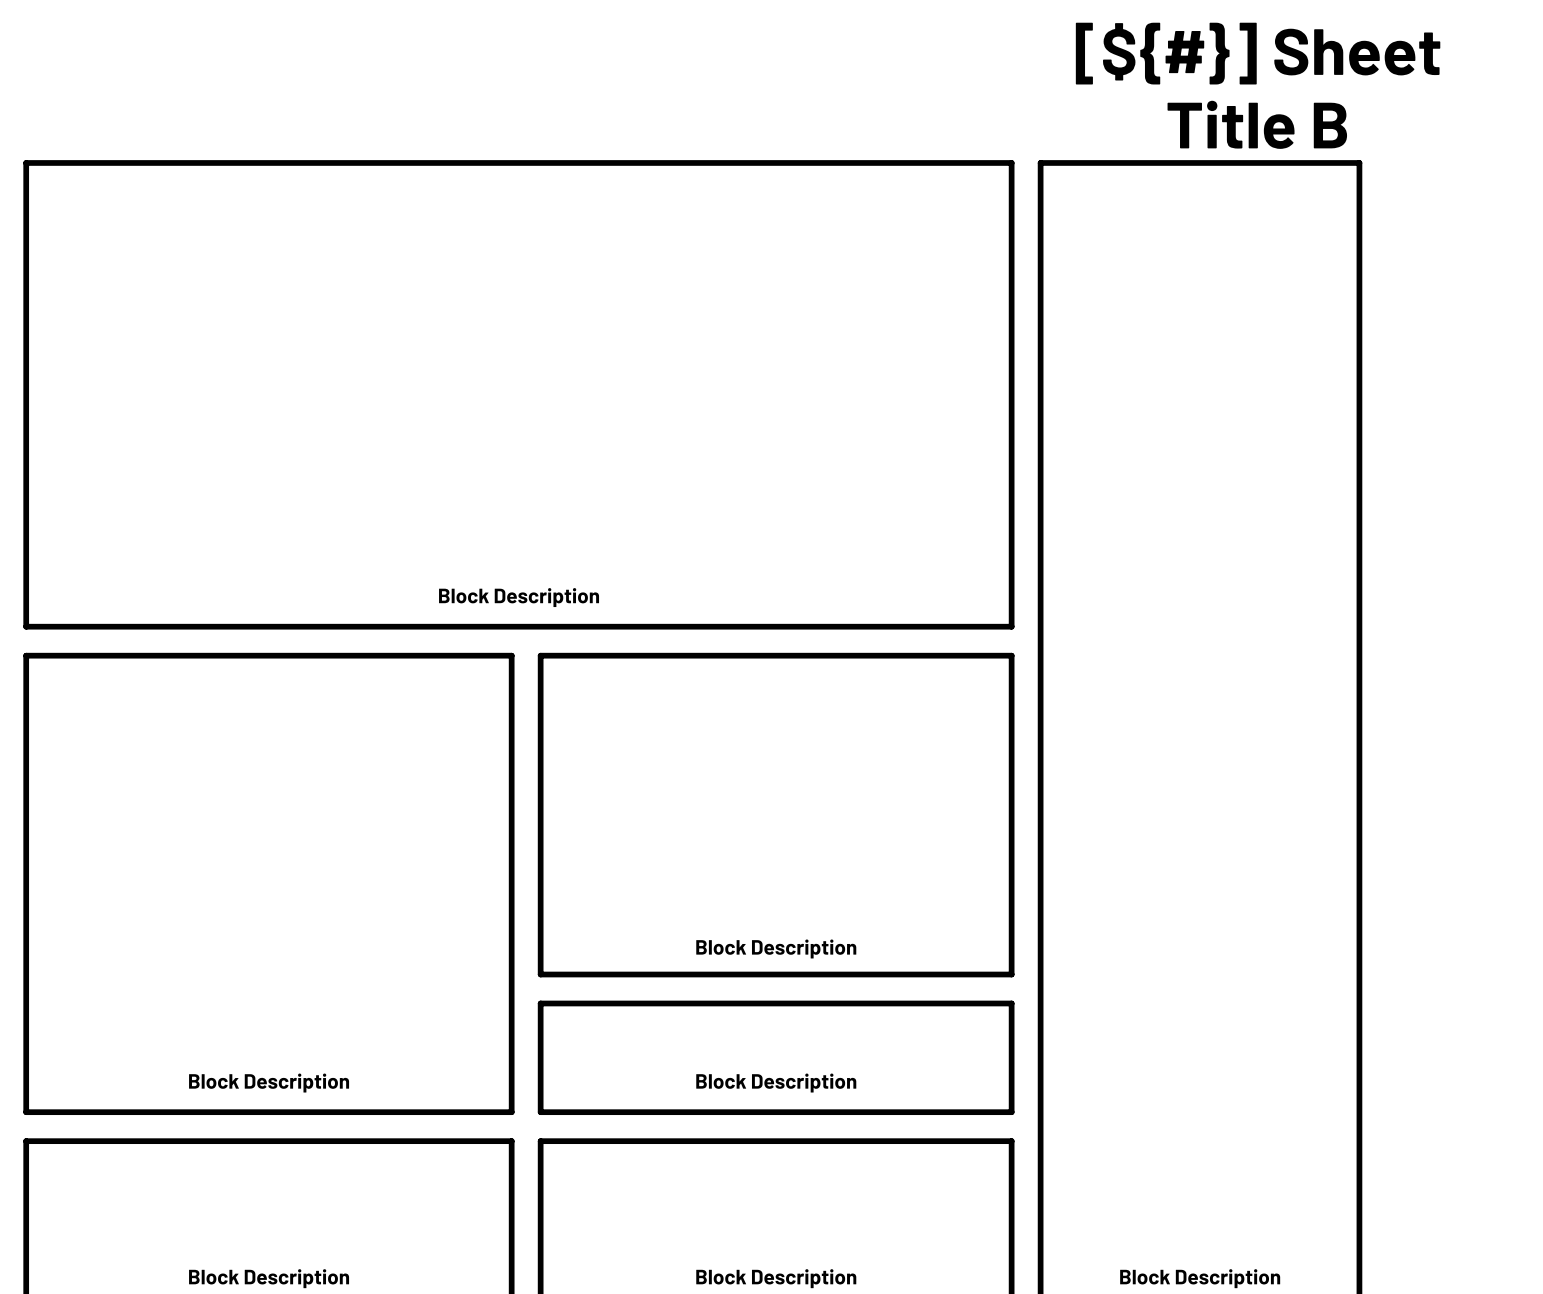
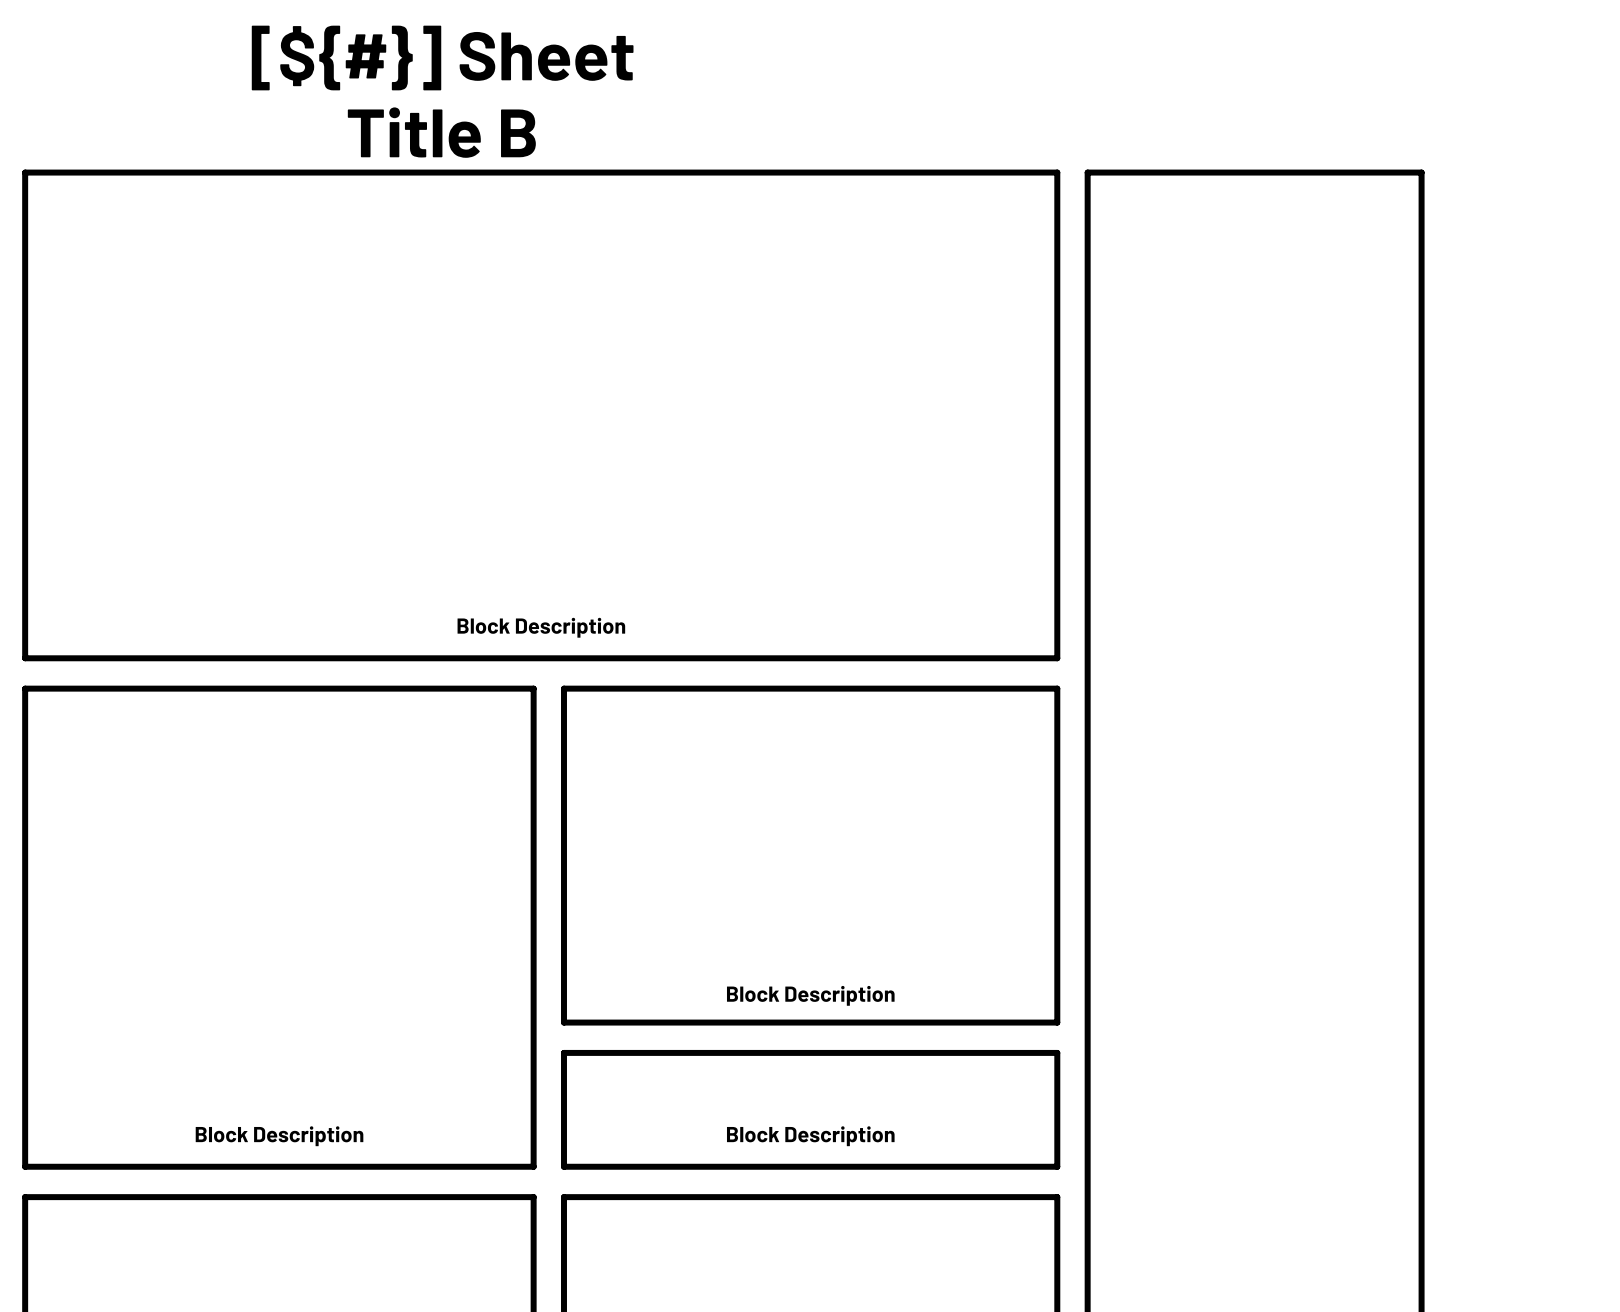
text: none -> [${#}] Sheet (442, 58)
text: [${#}] Sheet (1258, 53) -> none
text: none -> Title B (441, 132)
text: Title B (1257, 124) -> none

